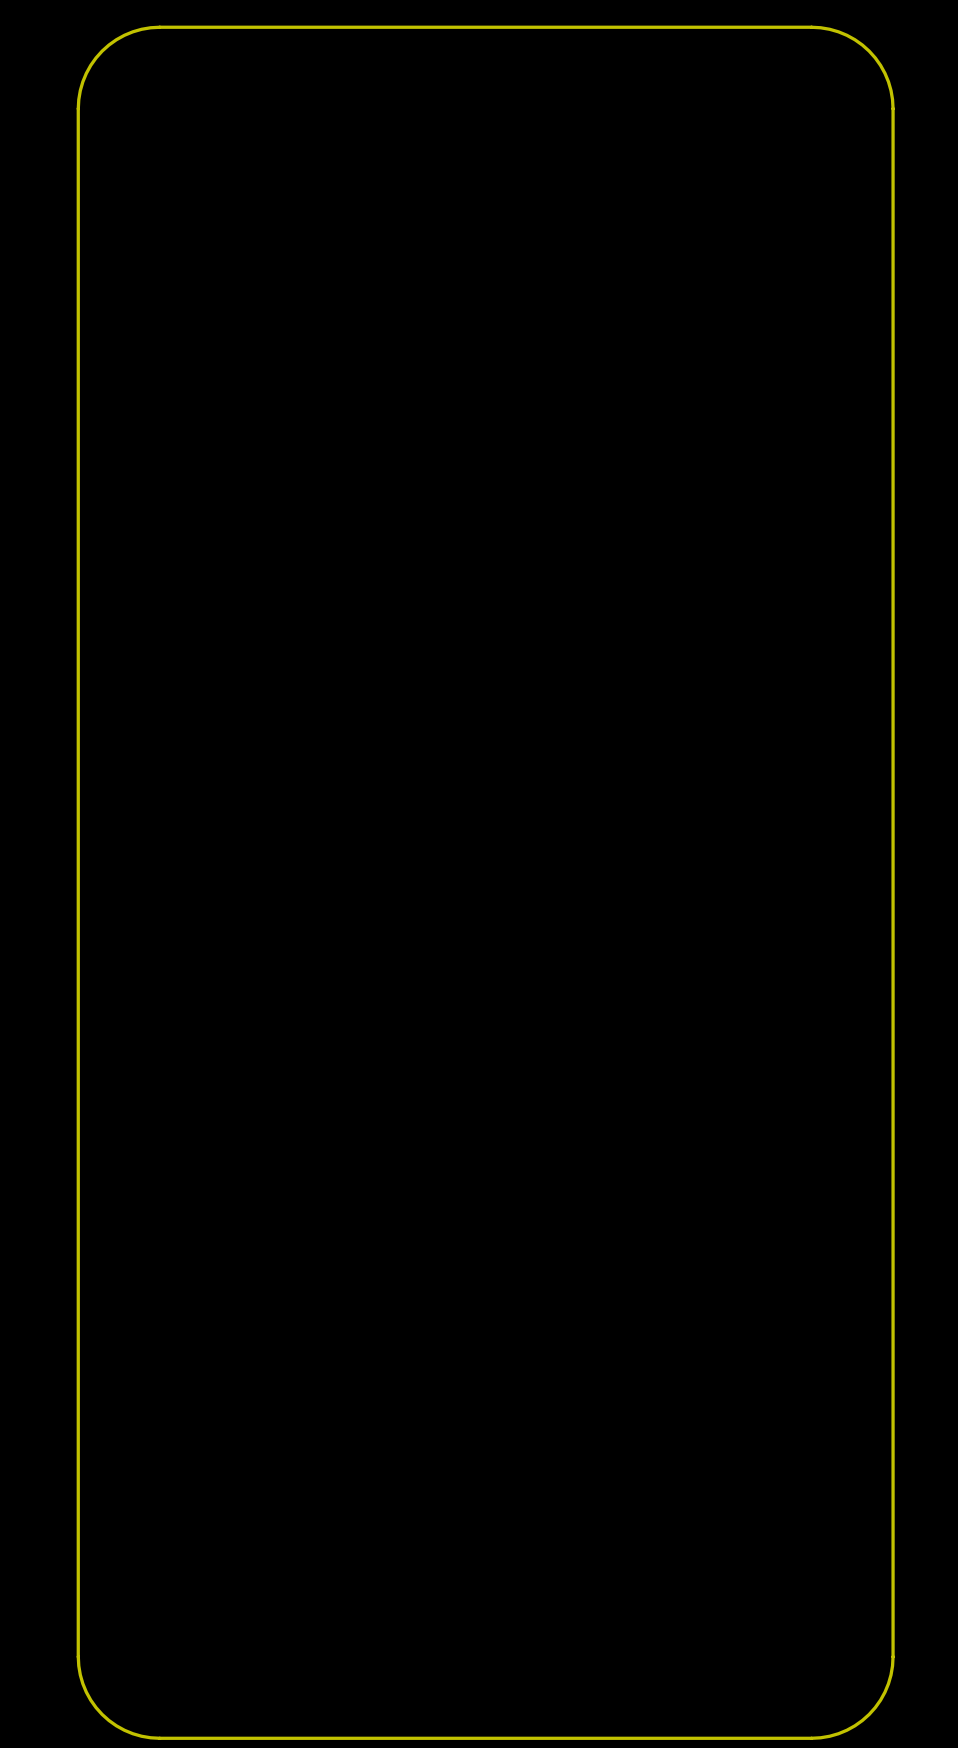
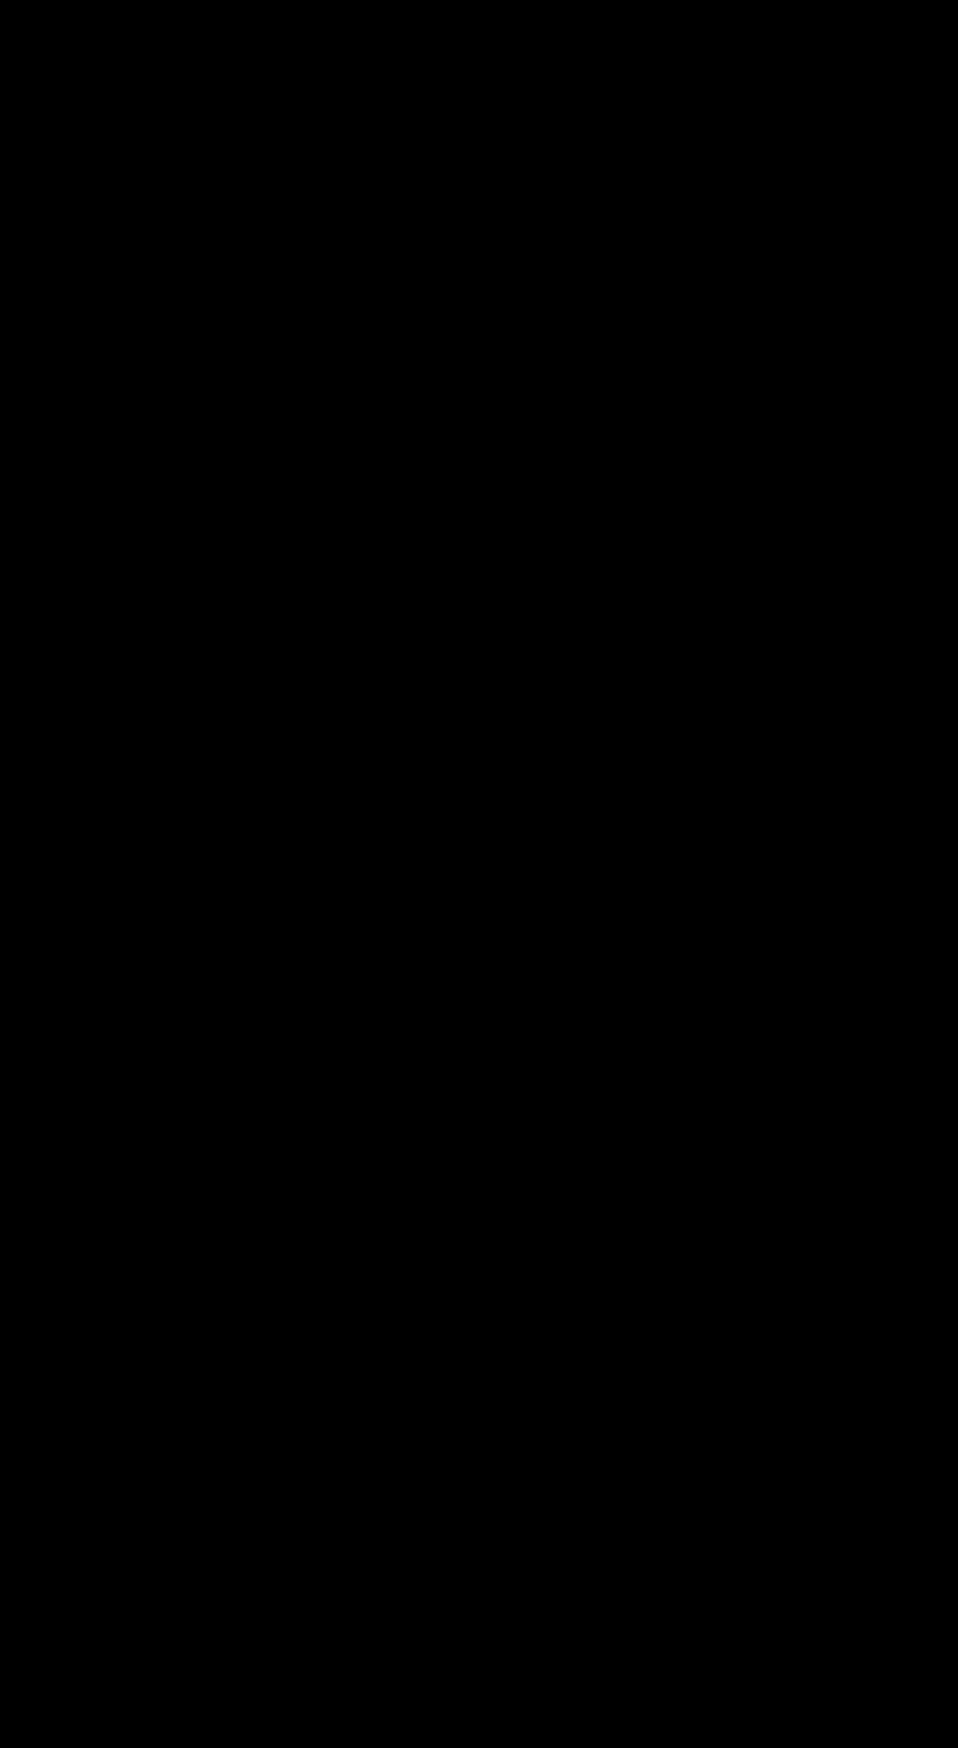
board edge: (159, 27) (820, 27) (838, 31) (862, 45) (880, 65) (888, 81) (893, 108) (893, 1656) (891, 1674) (880, 1700) (862, 1720) (838, 1733) (811, 1738) (150, 1737) (132, 1733) (108, 1720) (96, 1707) (82, 1683) (78, 1656) (78, 108) (82, 81) (90, 65) (102, 51) (124, 35) (141, 29) (159, 27) -> none

